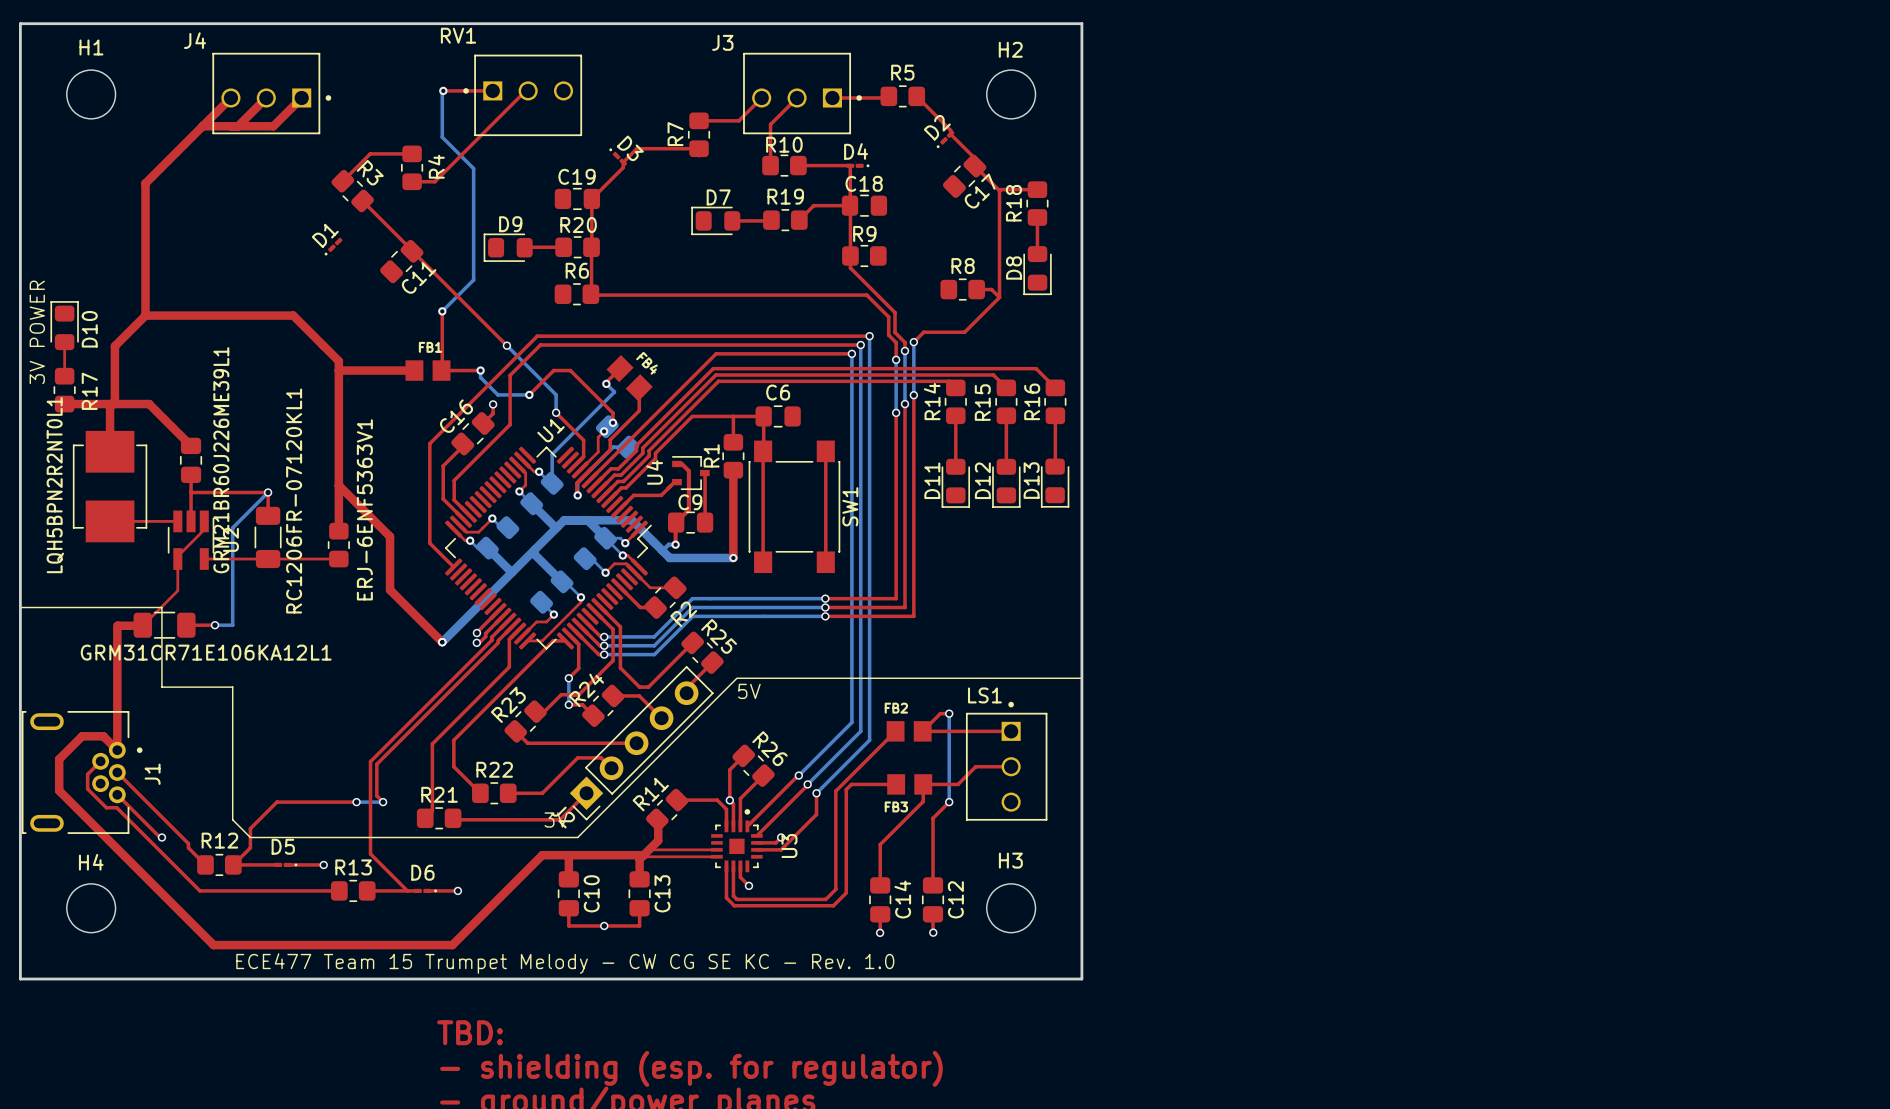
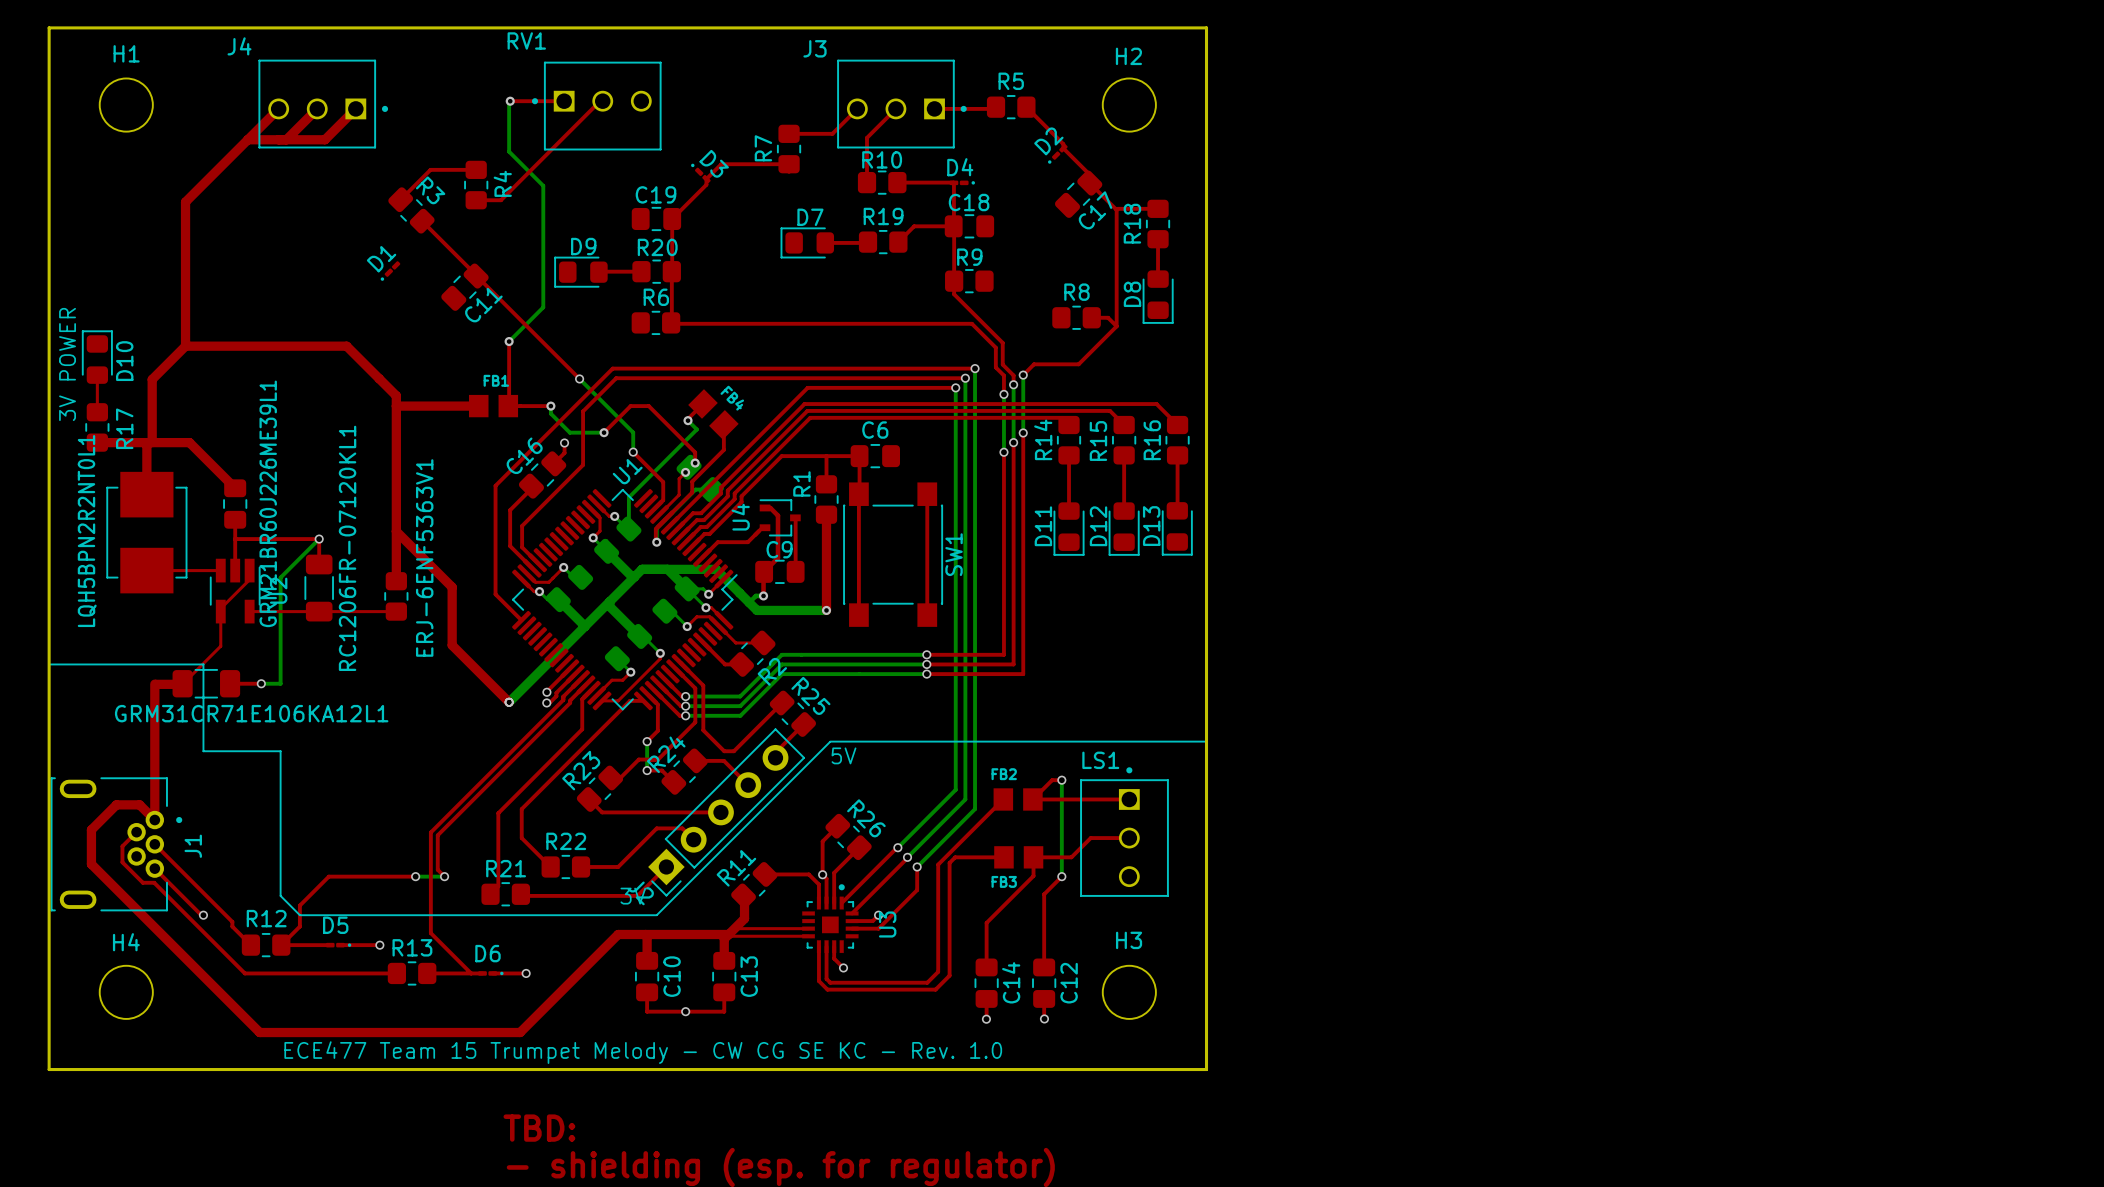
R1 name position: R1 (711, 455) -> R1 (801, 483)

